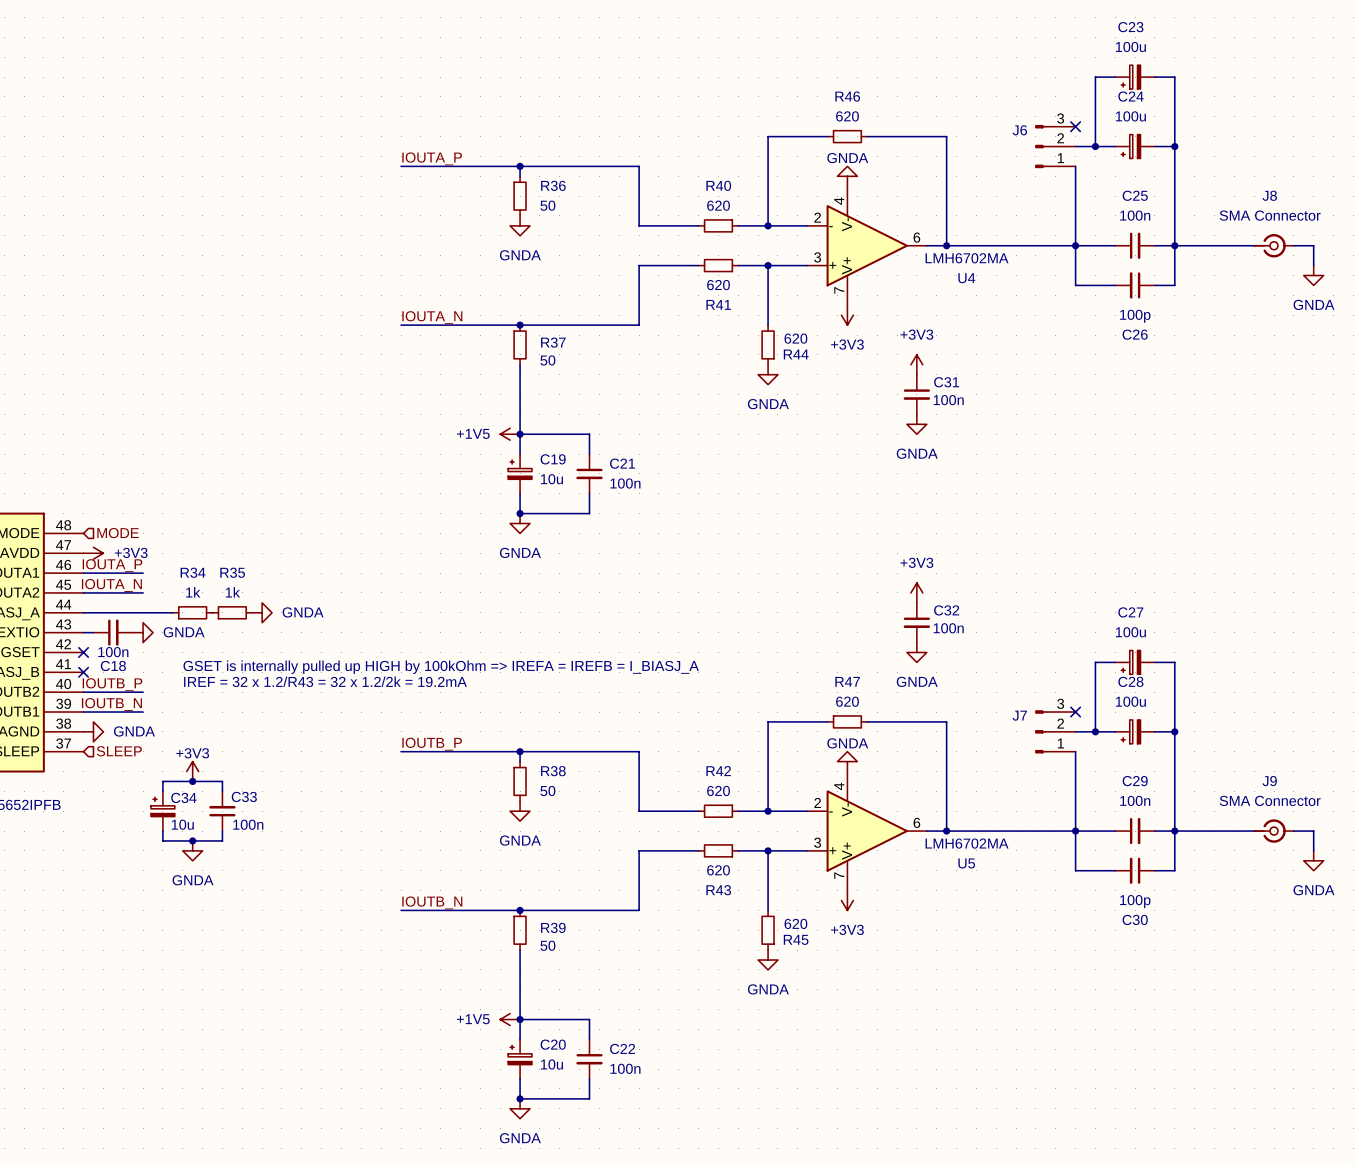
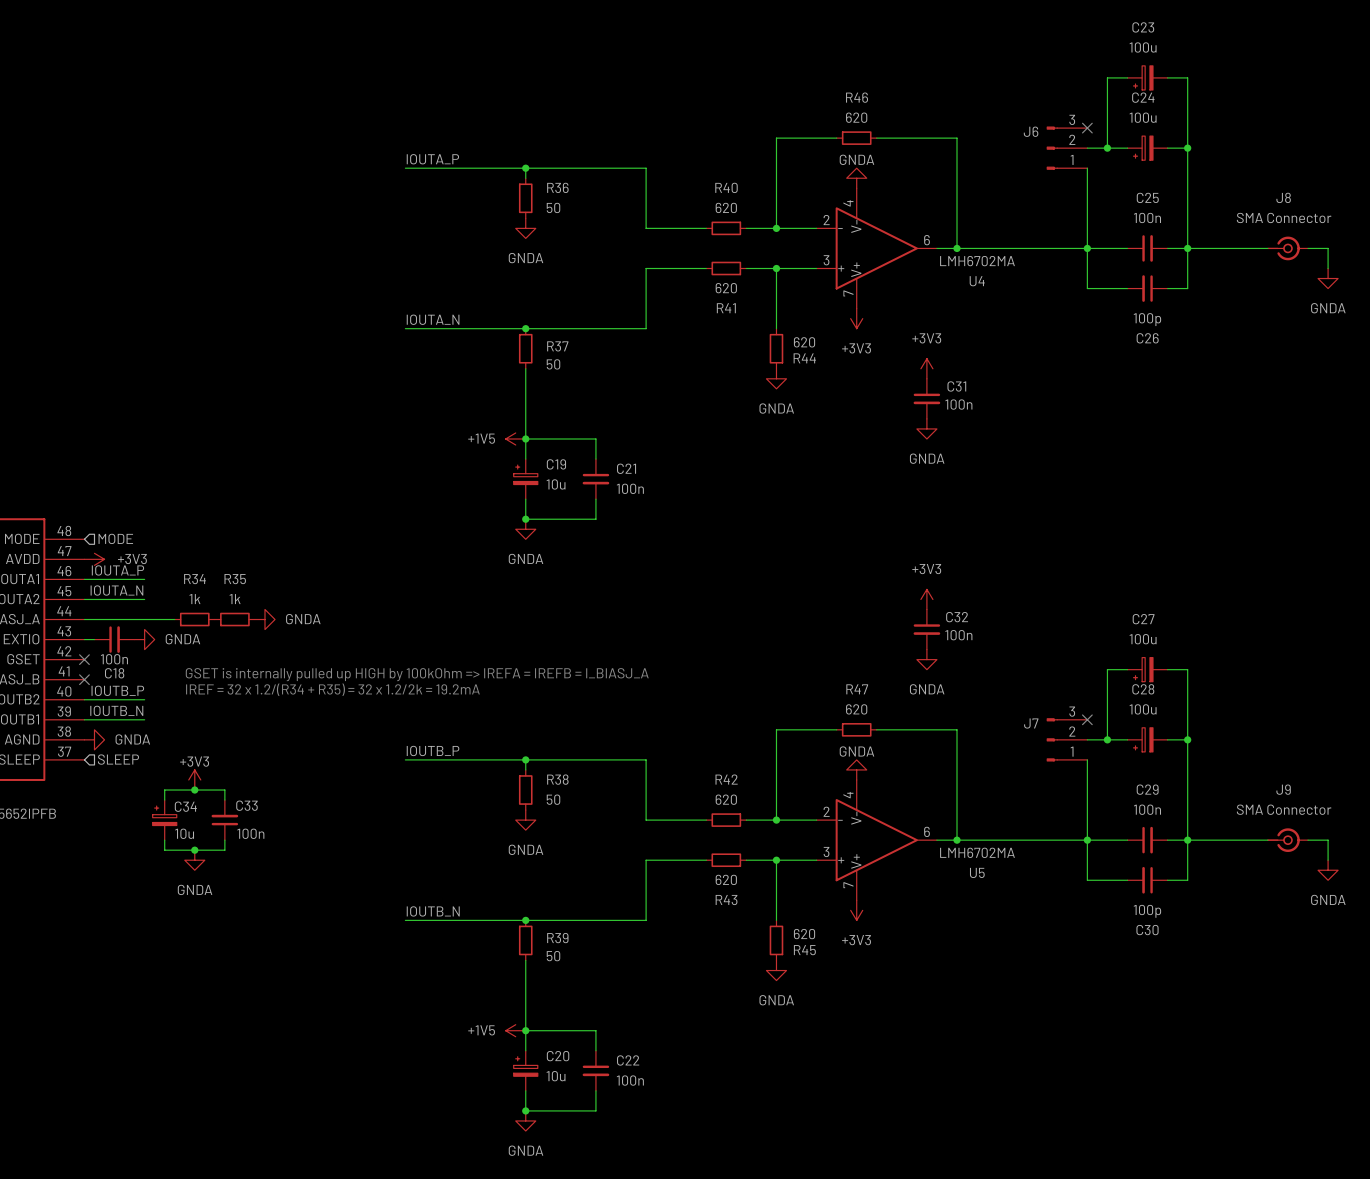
text: IREF = 32 x 1.2/R43 = 32 x 1.2/2k = 19.2mA (325, 681) -> IREF = 32 x 1.2/(R34 + R35) = 32 x 1.2/2k = 19.2mA (332, 689)

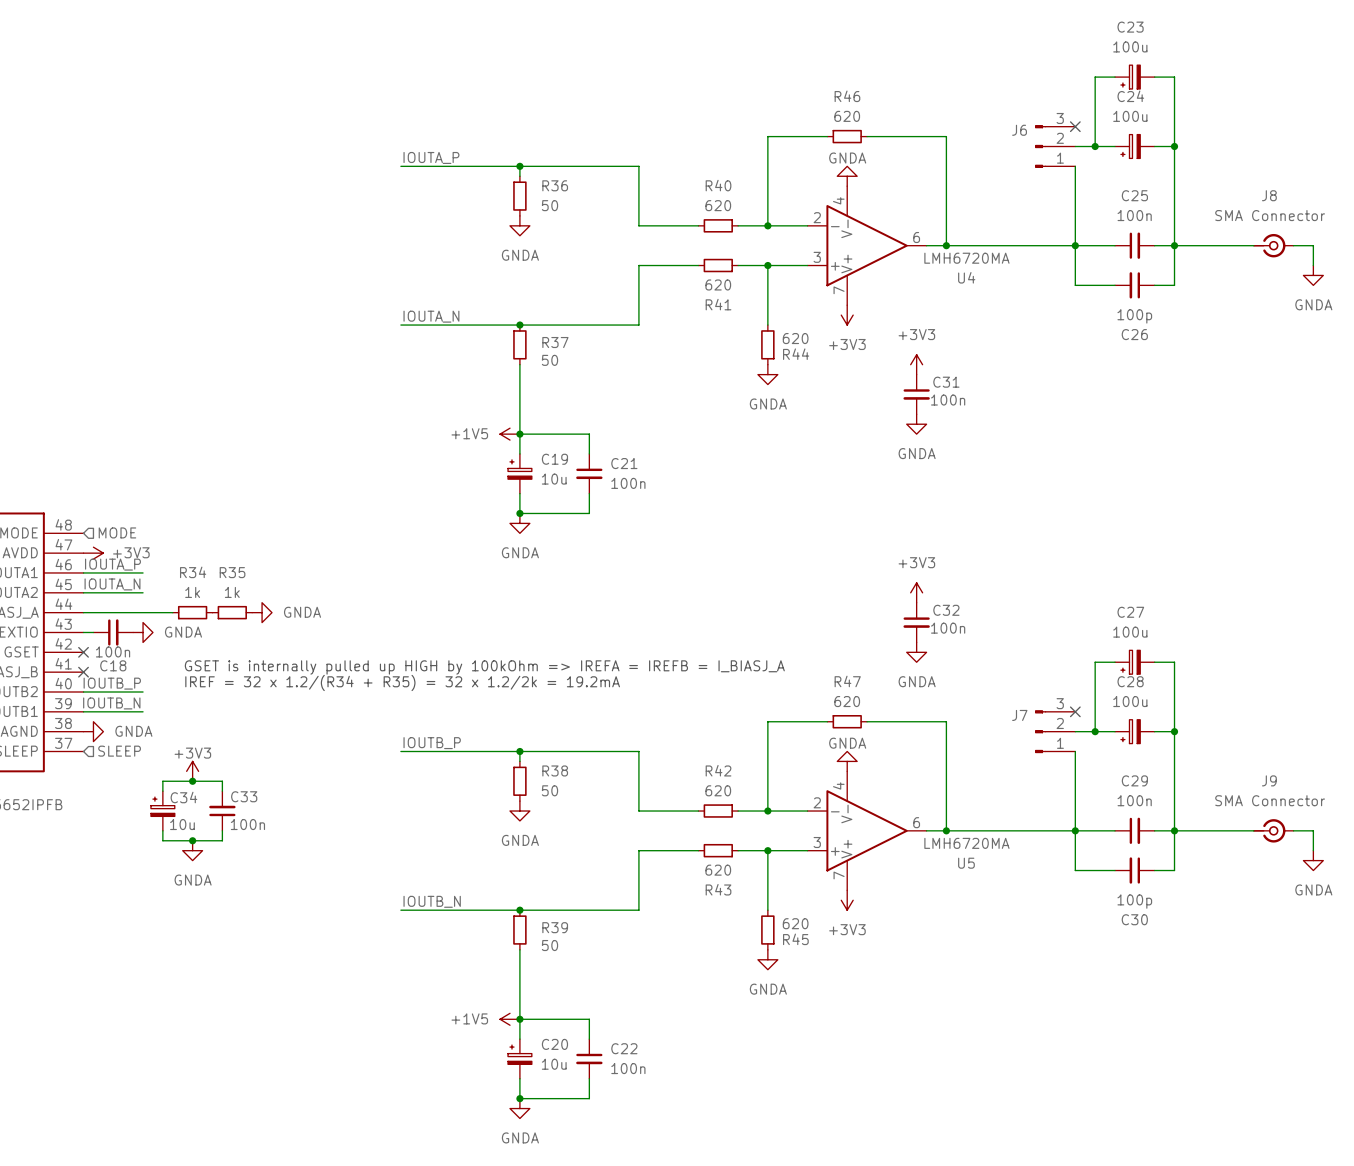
U4 value: LMH6702MA (977, 261) -> LMH6720MA (966, 258)
U5 value: LMH6702MA (977, 852) -> LMH6720MA (966, 843)

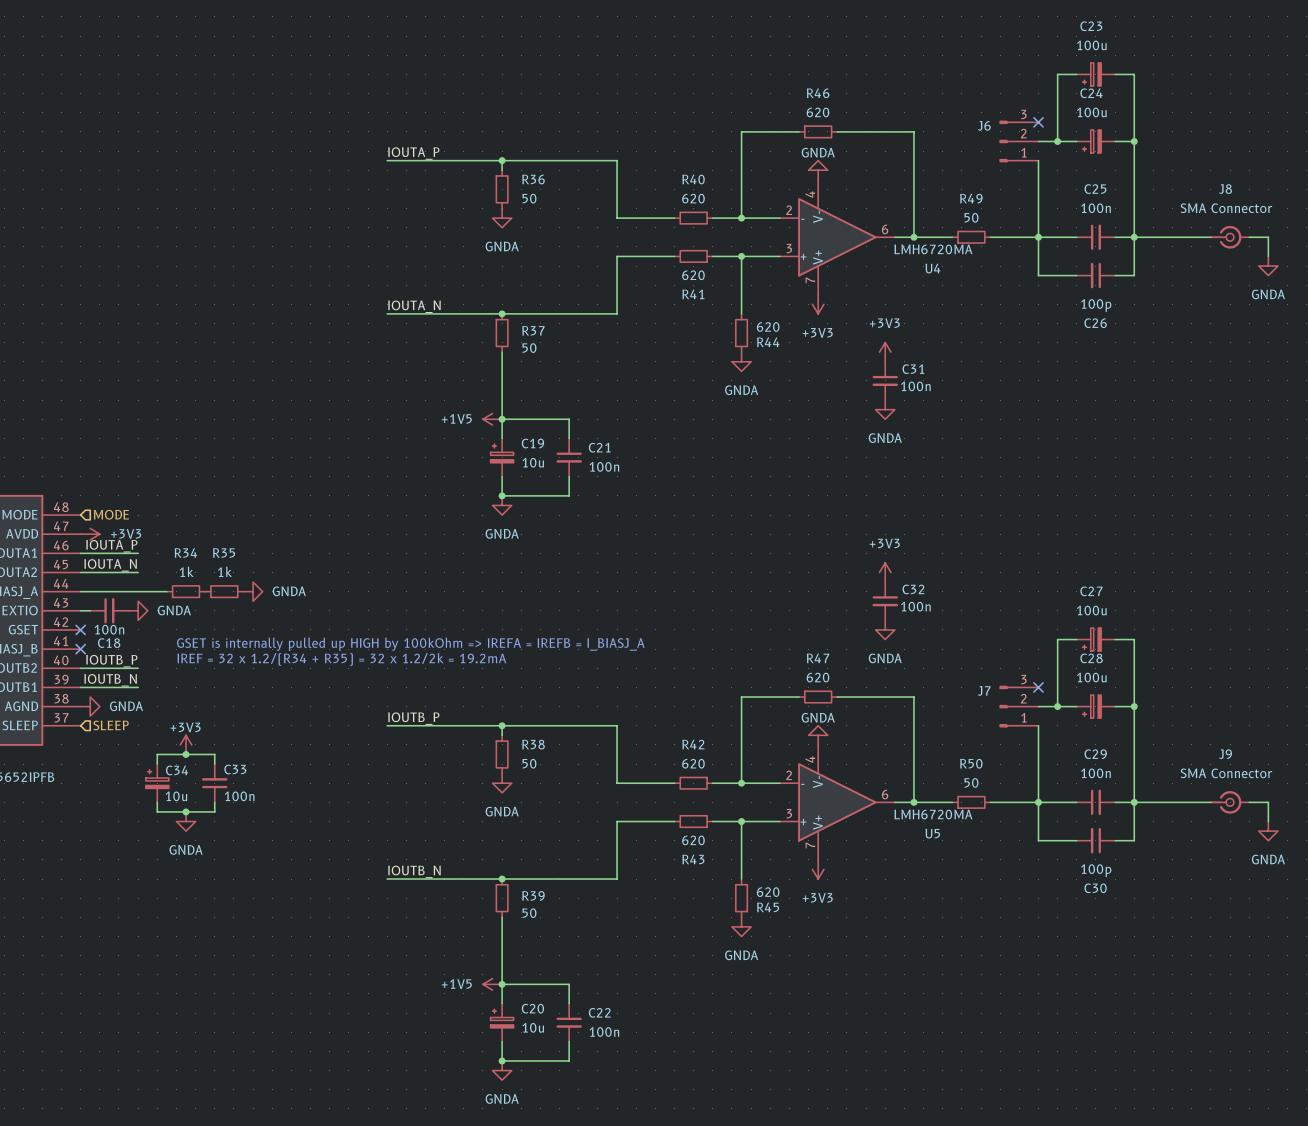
wire: (986, 245) (1025, 245) -> none
R49: none -> 50 (971, 237)
wire: (986, 830) (1025, 830) -> none
R50: none -> 50 (971, 802)

